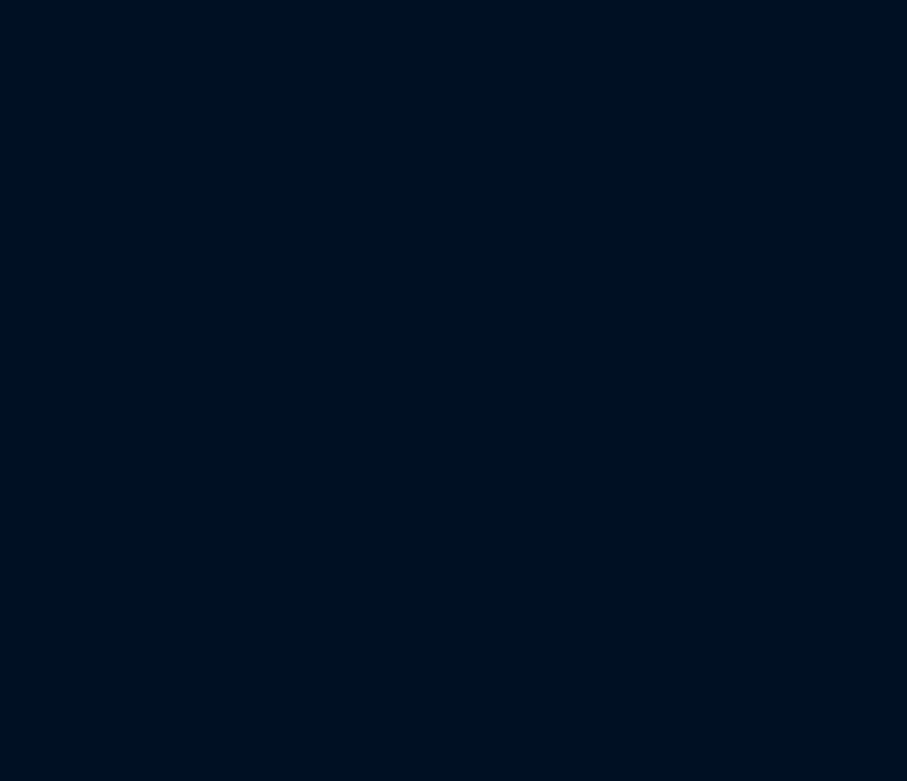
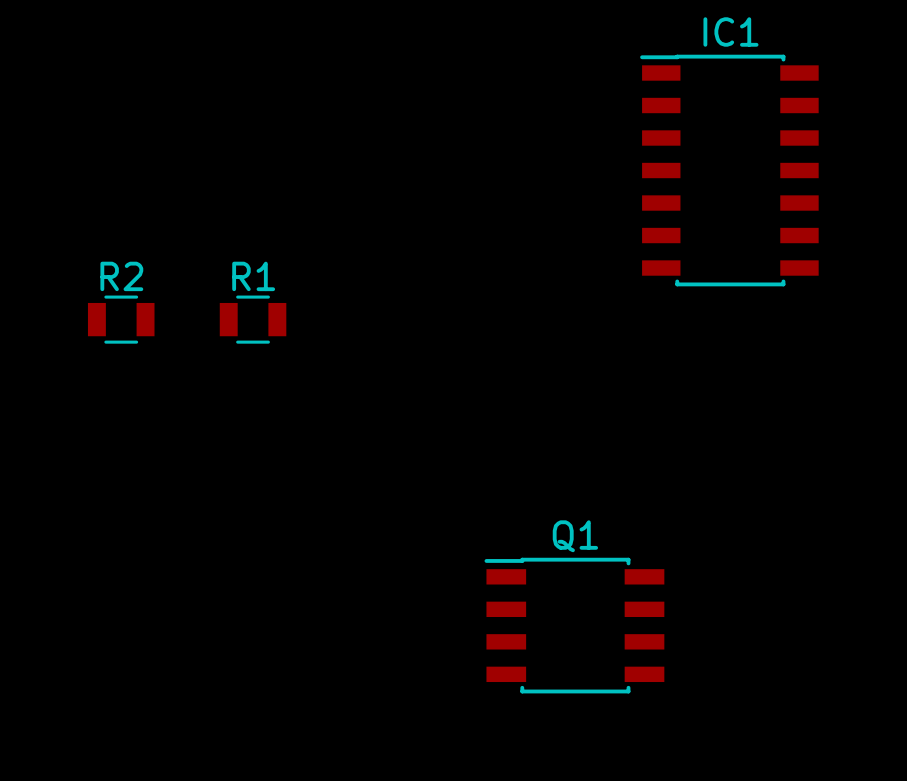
IC1: none -> (729, 170)
R2: none -> (121, 319)
R1: none -> (253, 319)
Q1: none -> (574, 625)

